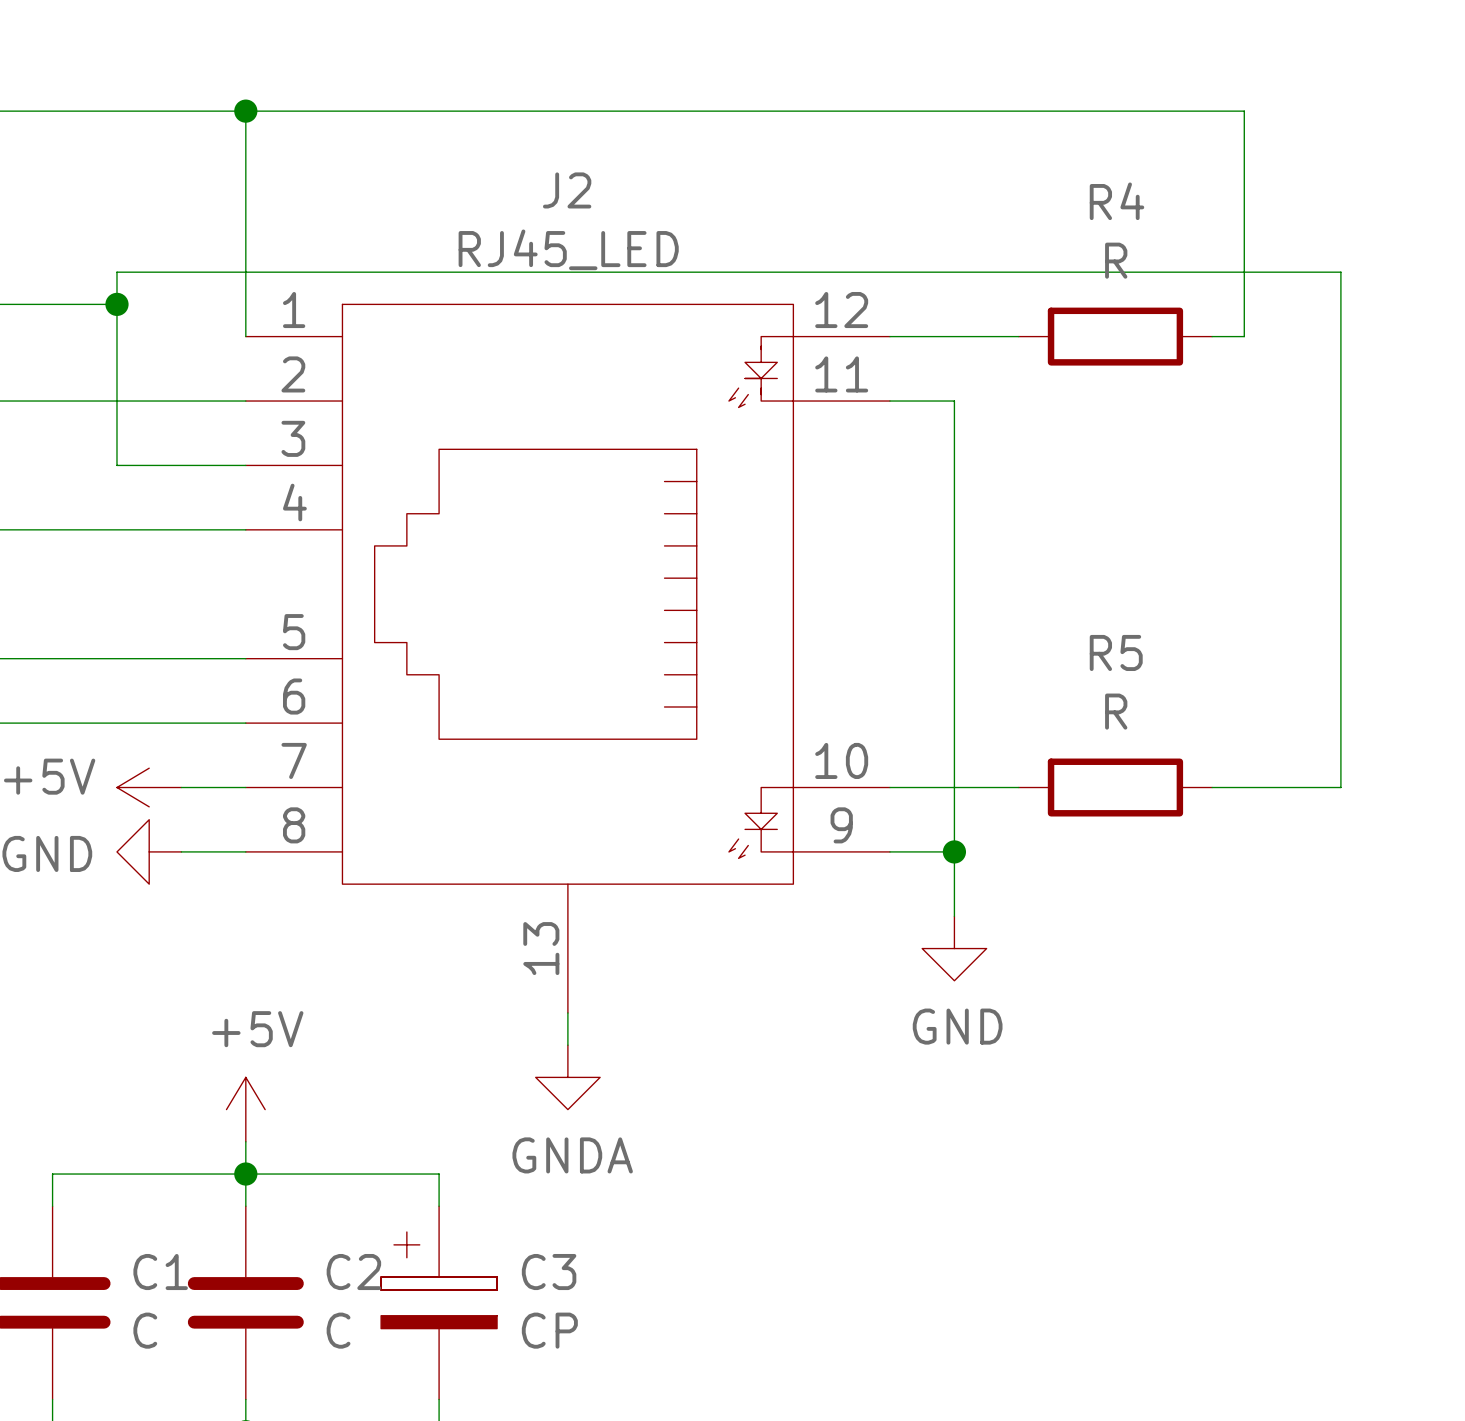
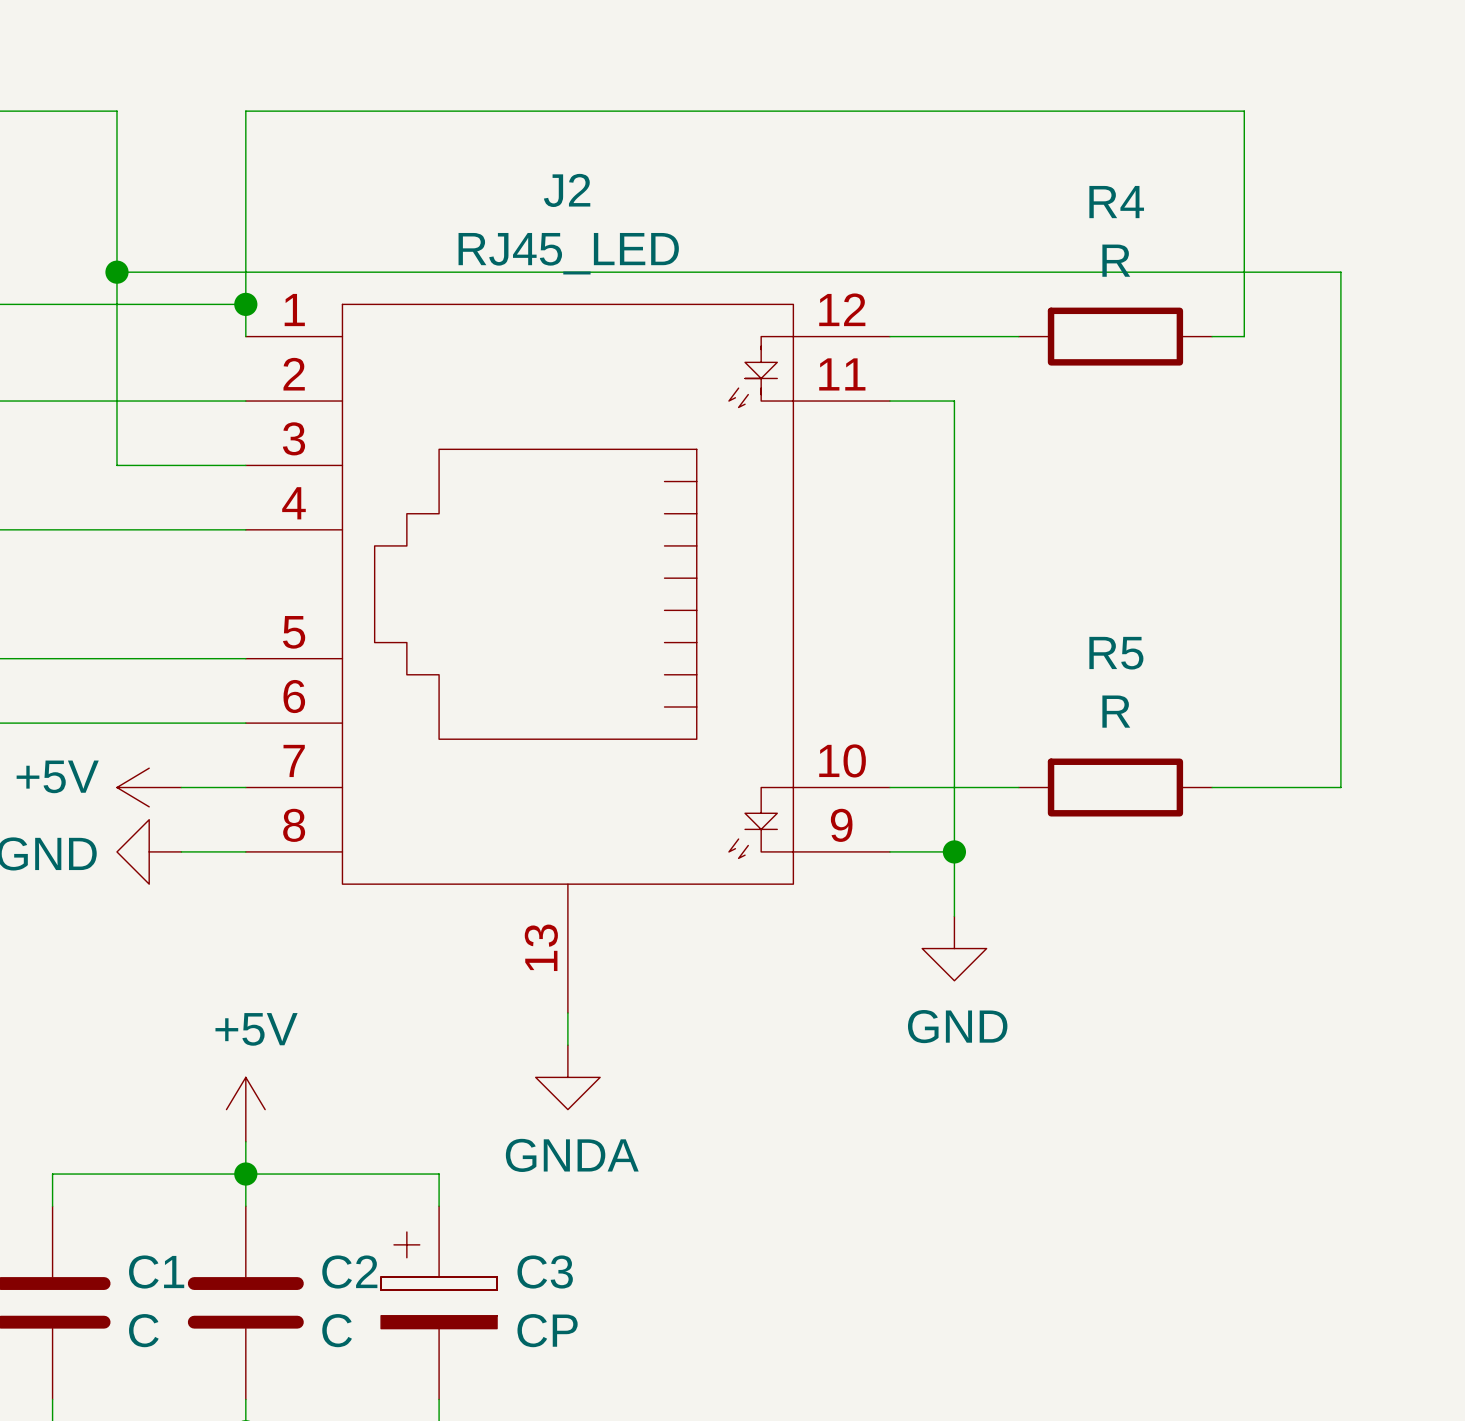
wire: (116, 111) (245, 111) -> (116, 111) (116, 272)
junction: (245, 111) -> none
wire: none -> (116, 304) (245, 304)
junction position: (116, 304) -> (116, 272)
junction: none -> (245, 304)

